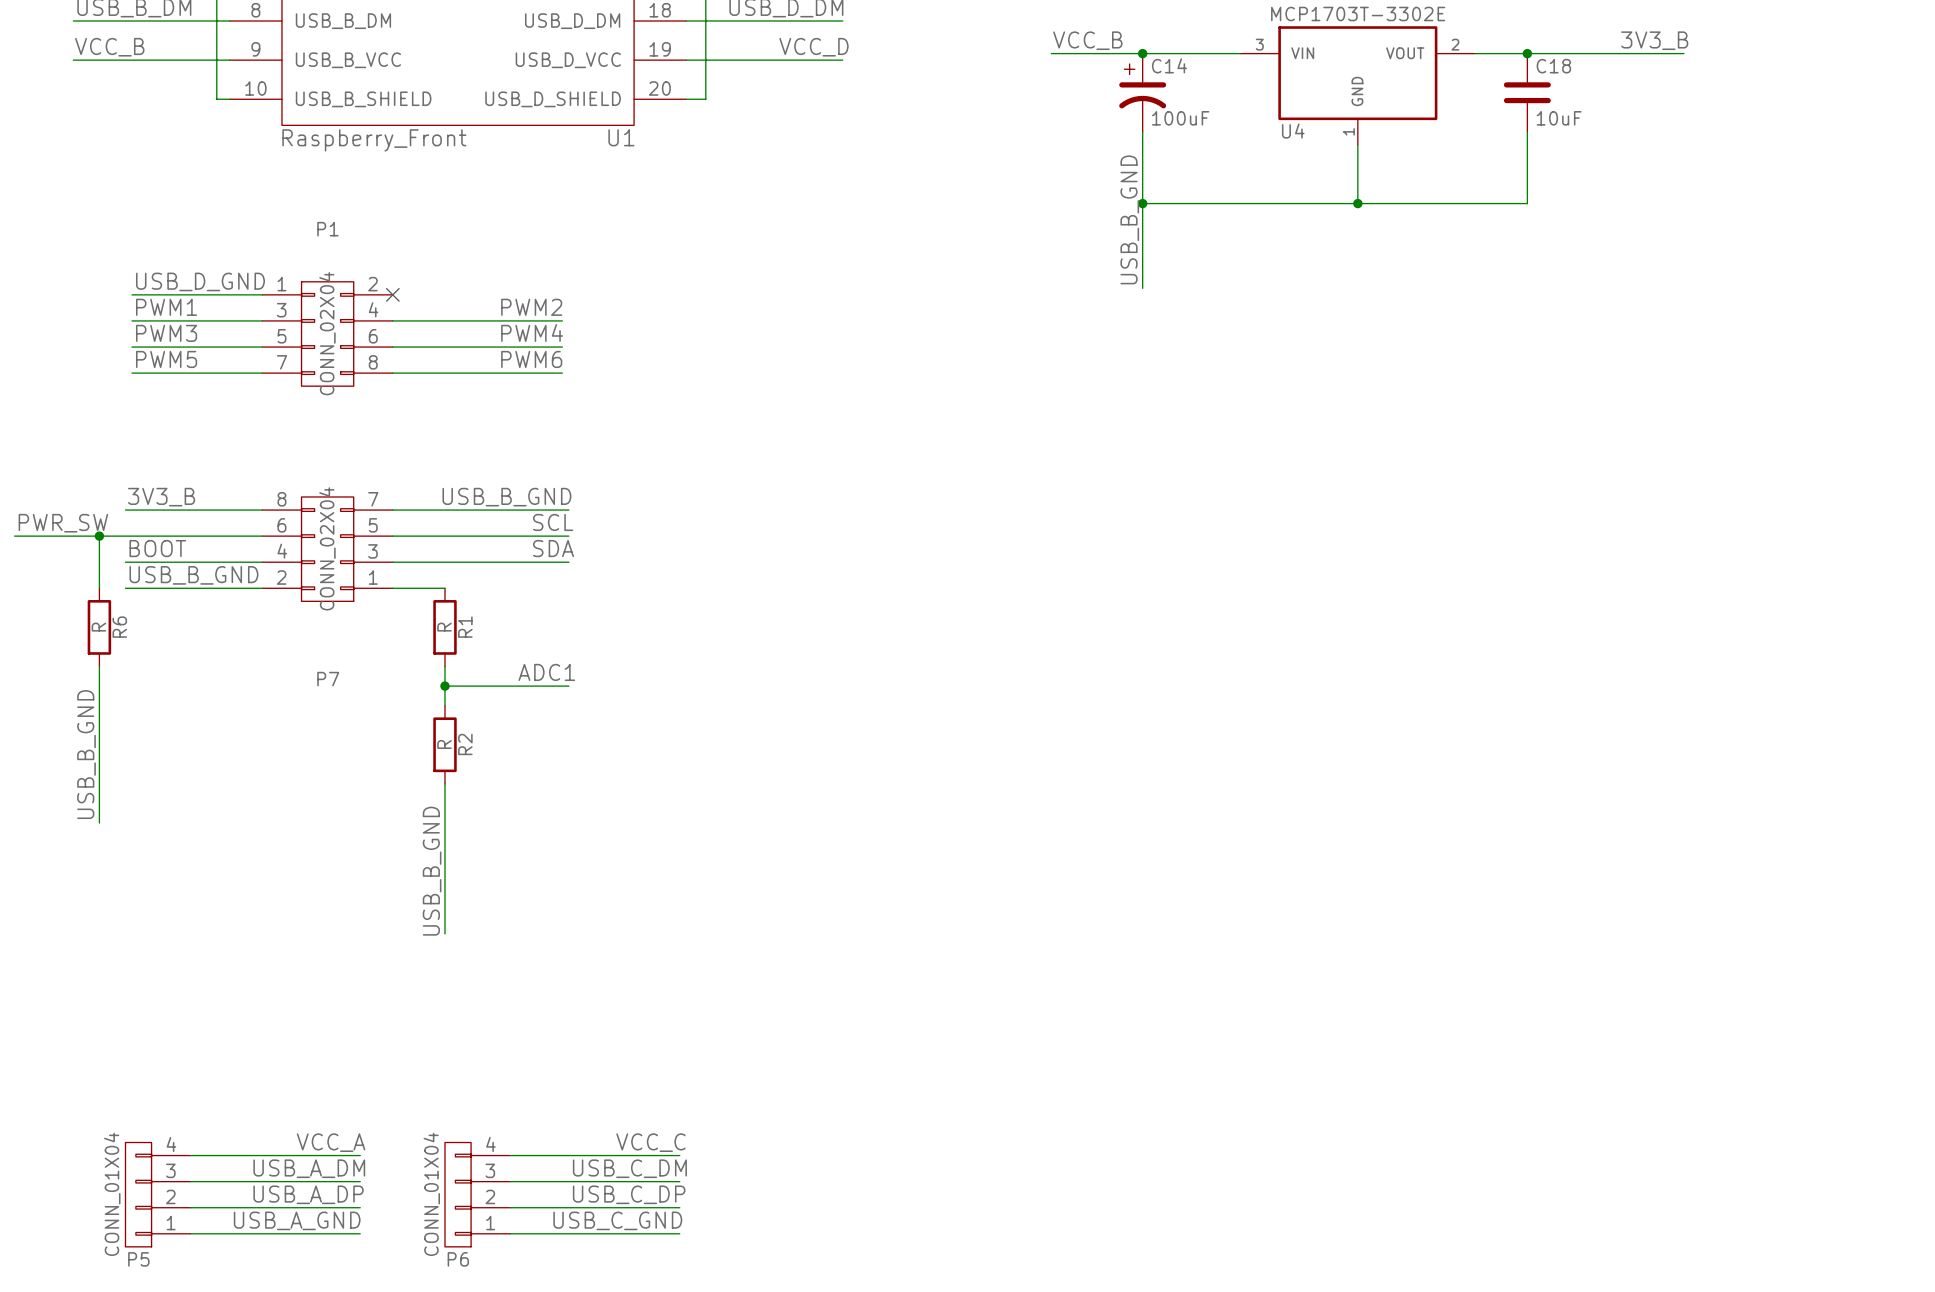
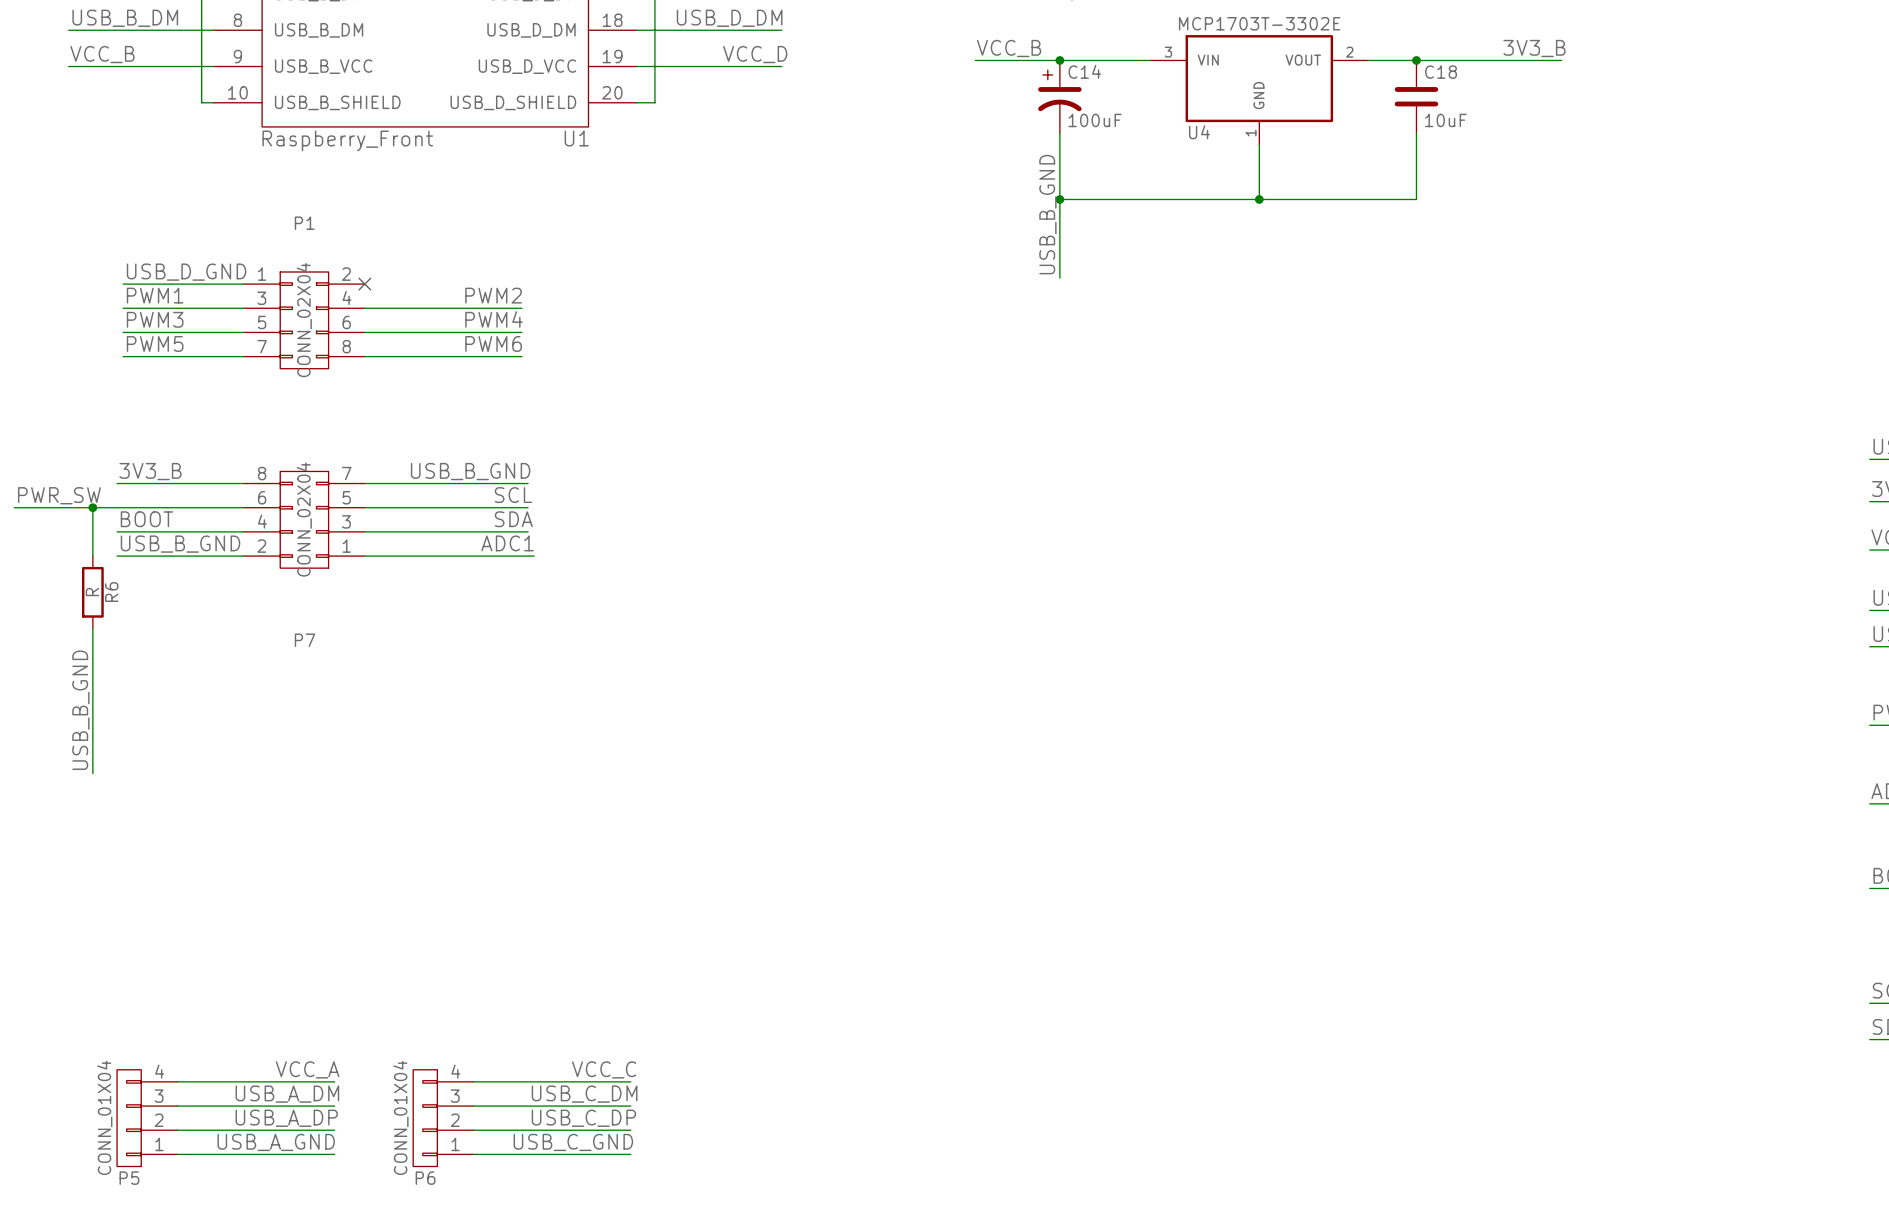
wire: none -> (413, 556) (534, 556)
R1: R (444, 627) -> none
wire: (444, 666) (444, 705) -> none
label position: ADC1 (546, 672) -> ADC1 (507, 543)
wire: (444, 686) (568, 686) -> none
junction: (444, 686) -> none
R2: R (444, 744) -> none
wire: (444, 783) (444, 933) -> none
label: USB_B_GND (432, 871) -> none

